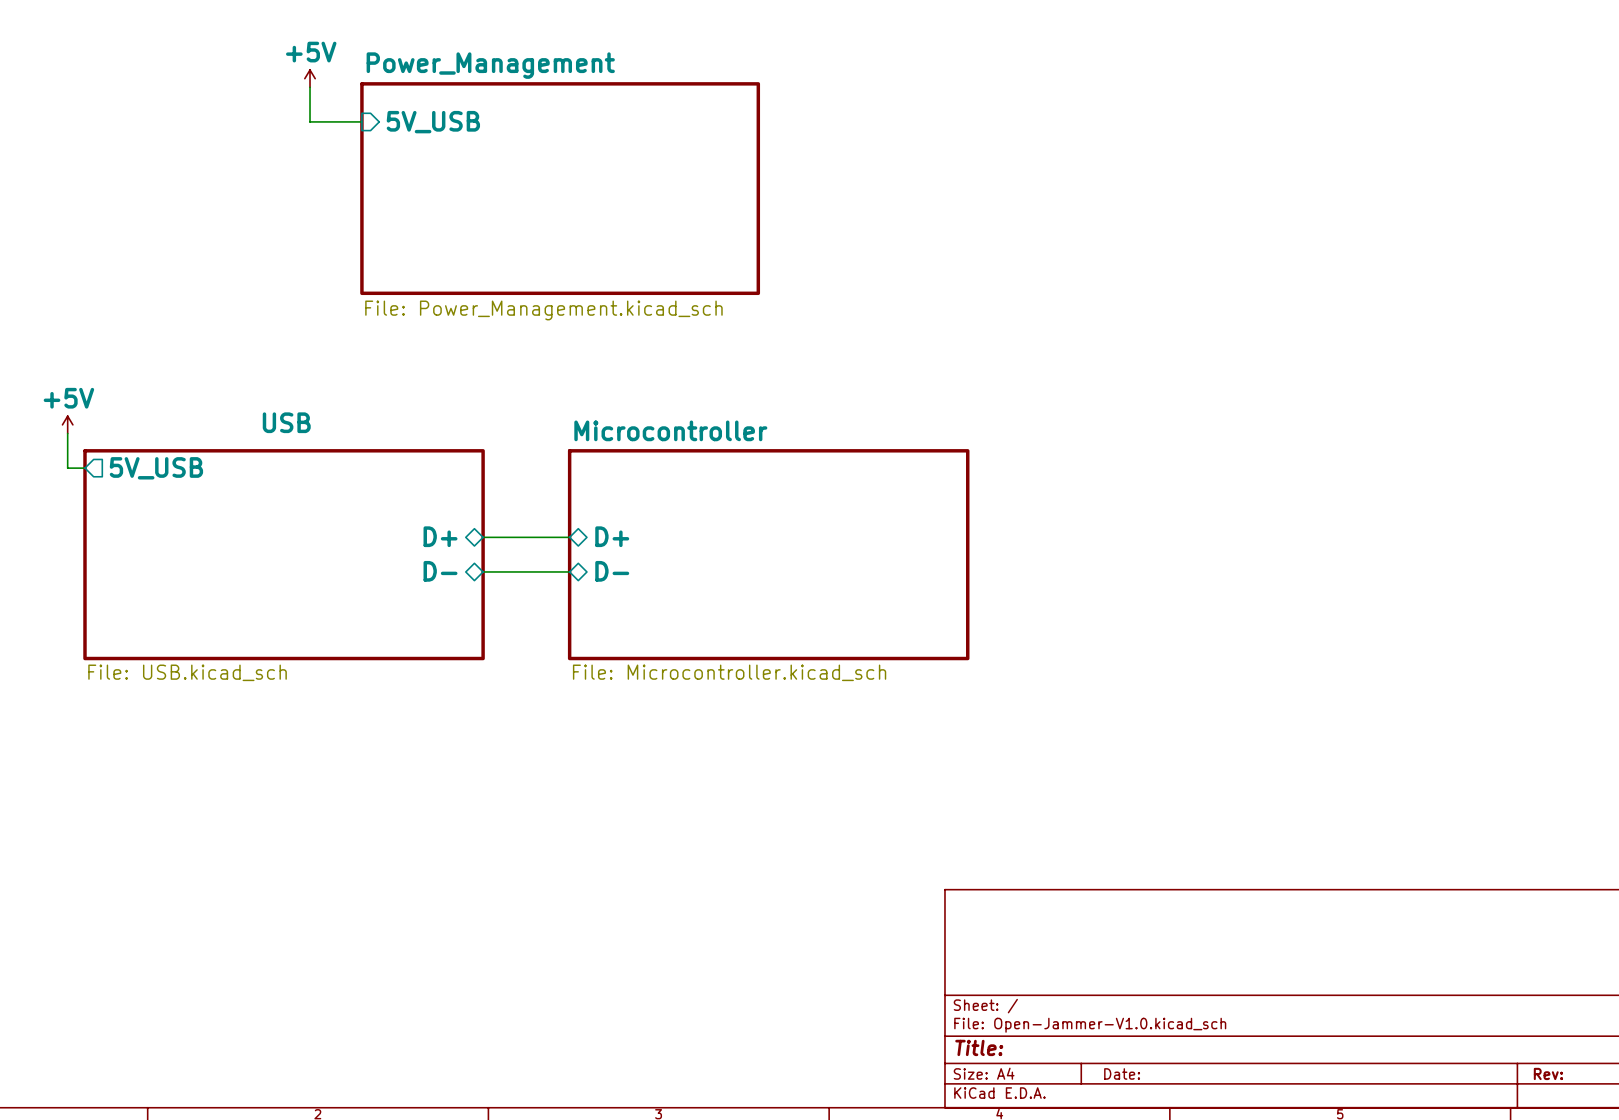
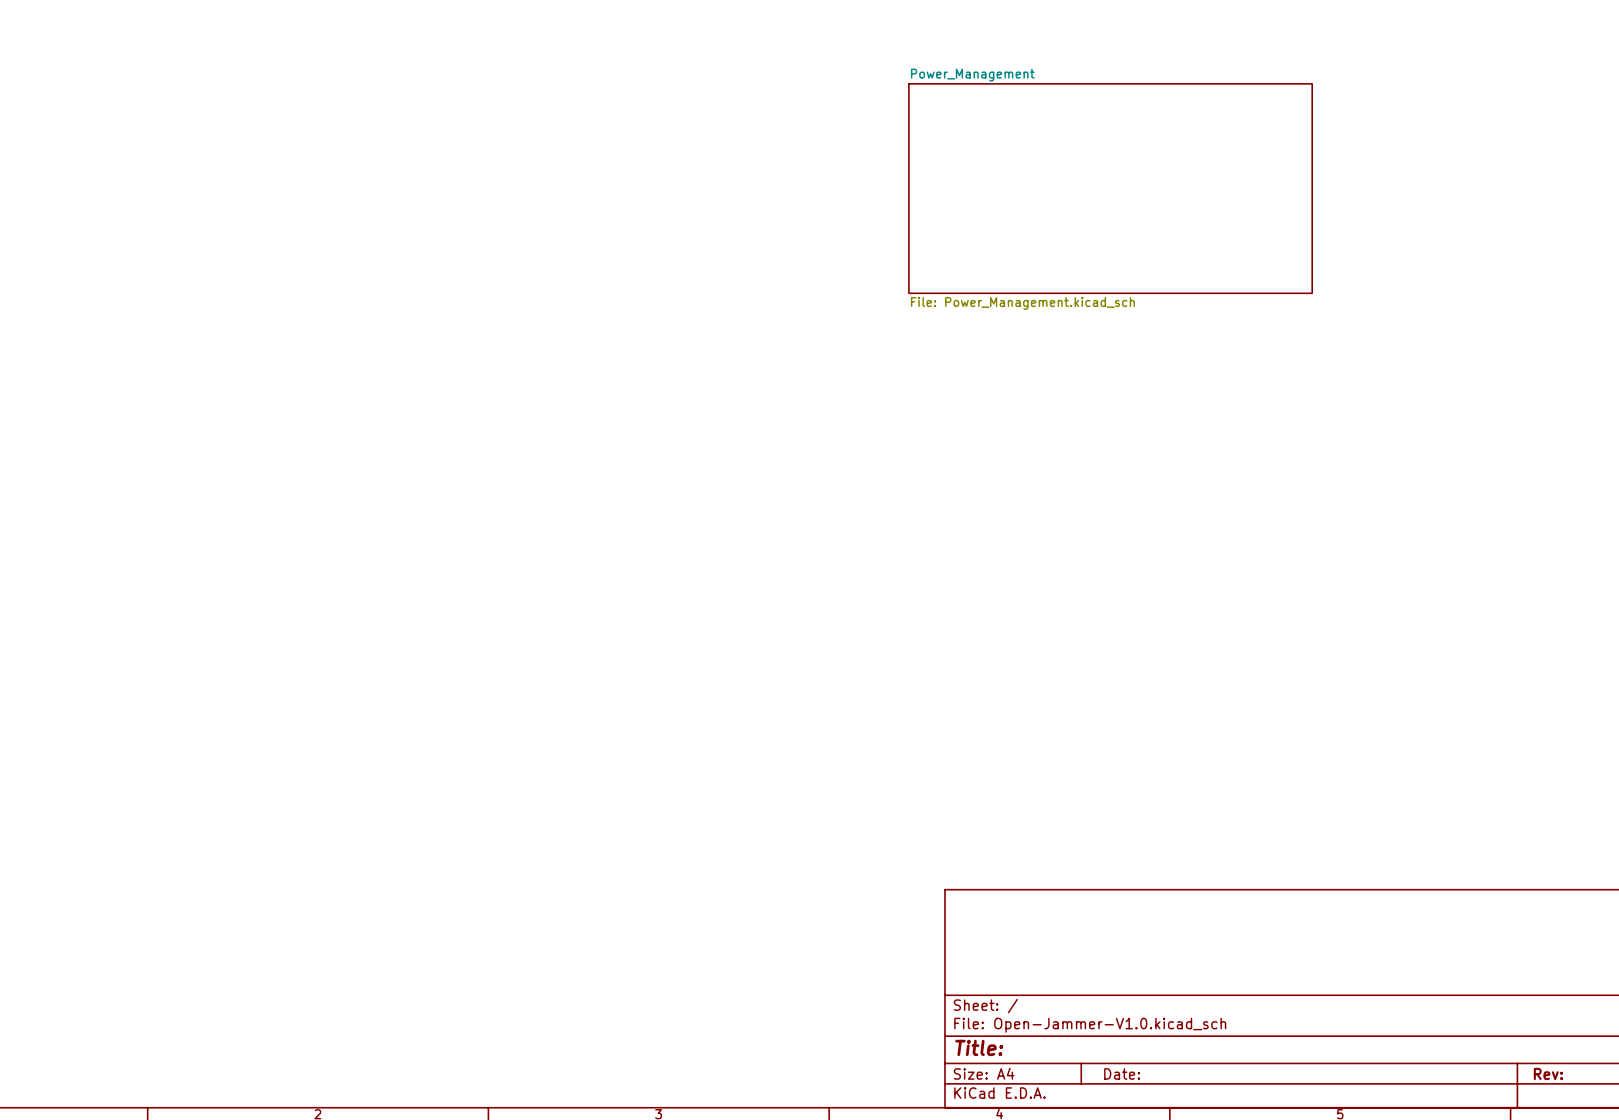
power symbol: +5V (310, 78) -> none
wire: (310, 87) (310, 121) (361, 121) -> none
sheet pin: 5V_USB (433, 122) -> none
sheet Power_Management: File: Power_Management.kicad_sch (560, 188) -> none
sheet Power_Management: none -> File: Power_Management.kicad_sch (1110, 188)
power symbol: +5V (67, 424) -> none
wire: (67, 433) (67, 468) (84, 468) -> none
sheet pin: 5V_USB (156, 468) -> none
sheet pin: D+ (440, 536) -> none
sheet pin: D+ (612, 536) -> none
wire: (483, 537) (569, 537) -> none
sheet USB: File: USB.kicad_sch (284, 554) -> none
sheet Microcontroller: File: Microcontroller.kicad_sch (768, 554) -> none
sheet pin: D- (440, 571) -> none
wire: (483, 571) (569, 571) -> none
sheet pin: D- (612, 571) -> none

